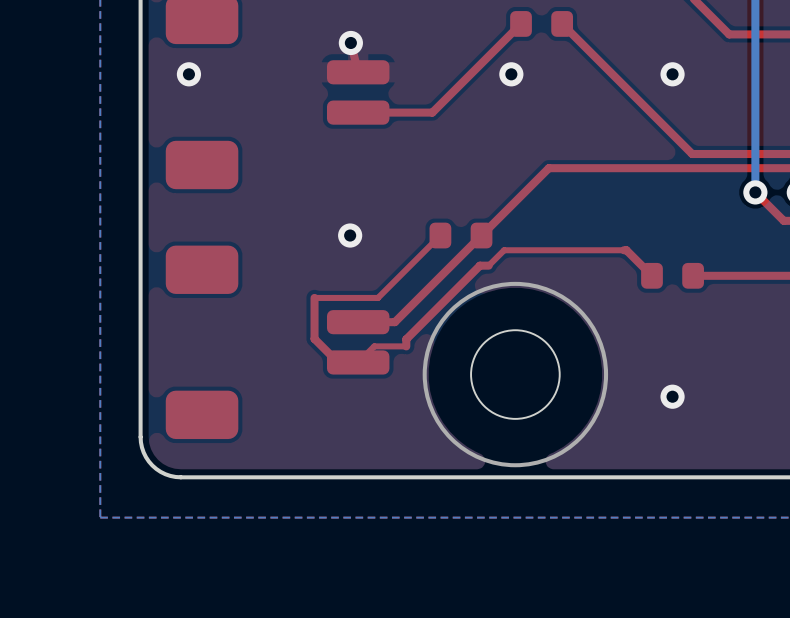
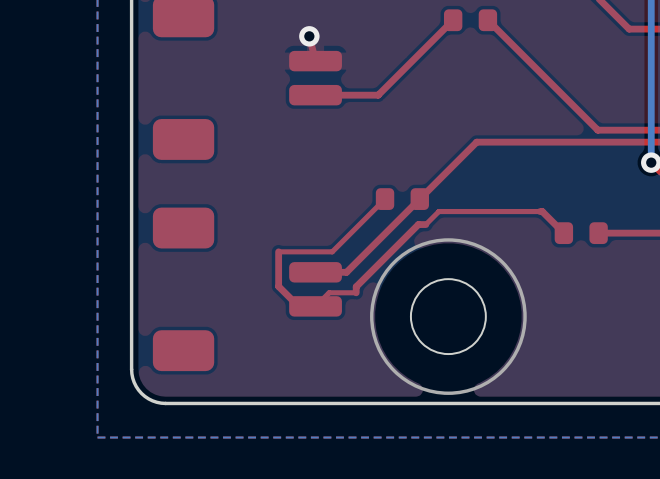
via: (188, 74) -> none
via: (511, 74) -> none
via: (672, 74) -> none
via: (350, 235) -> none
via: (672, 396) -> none

